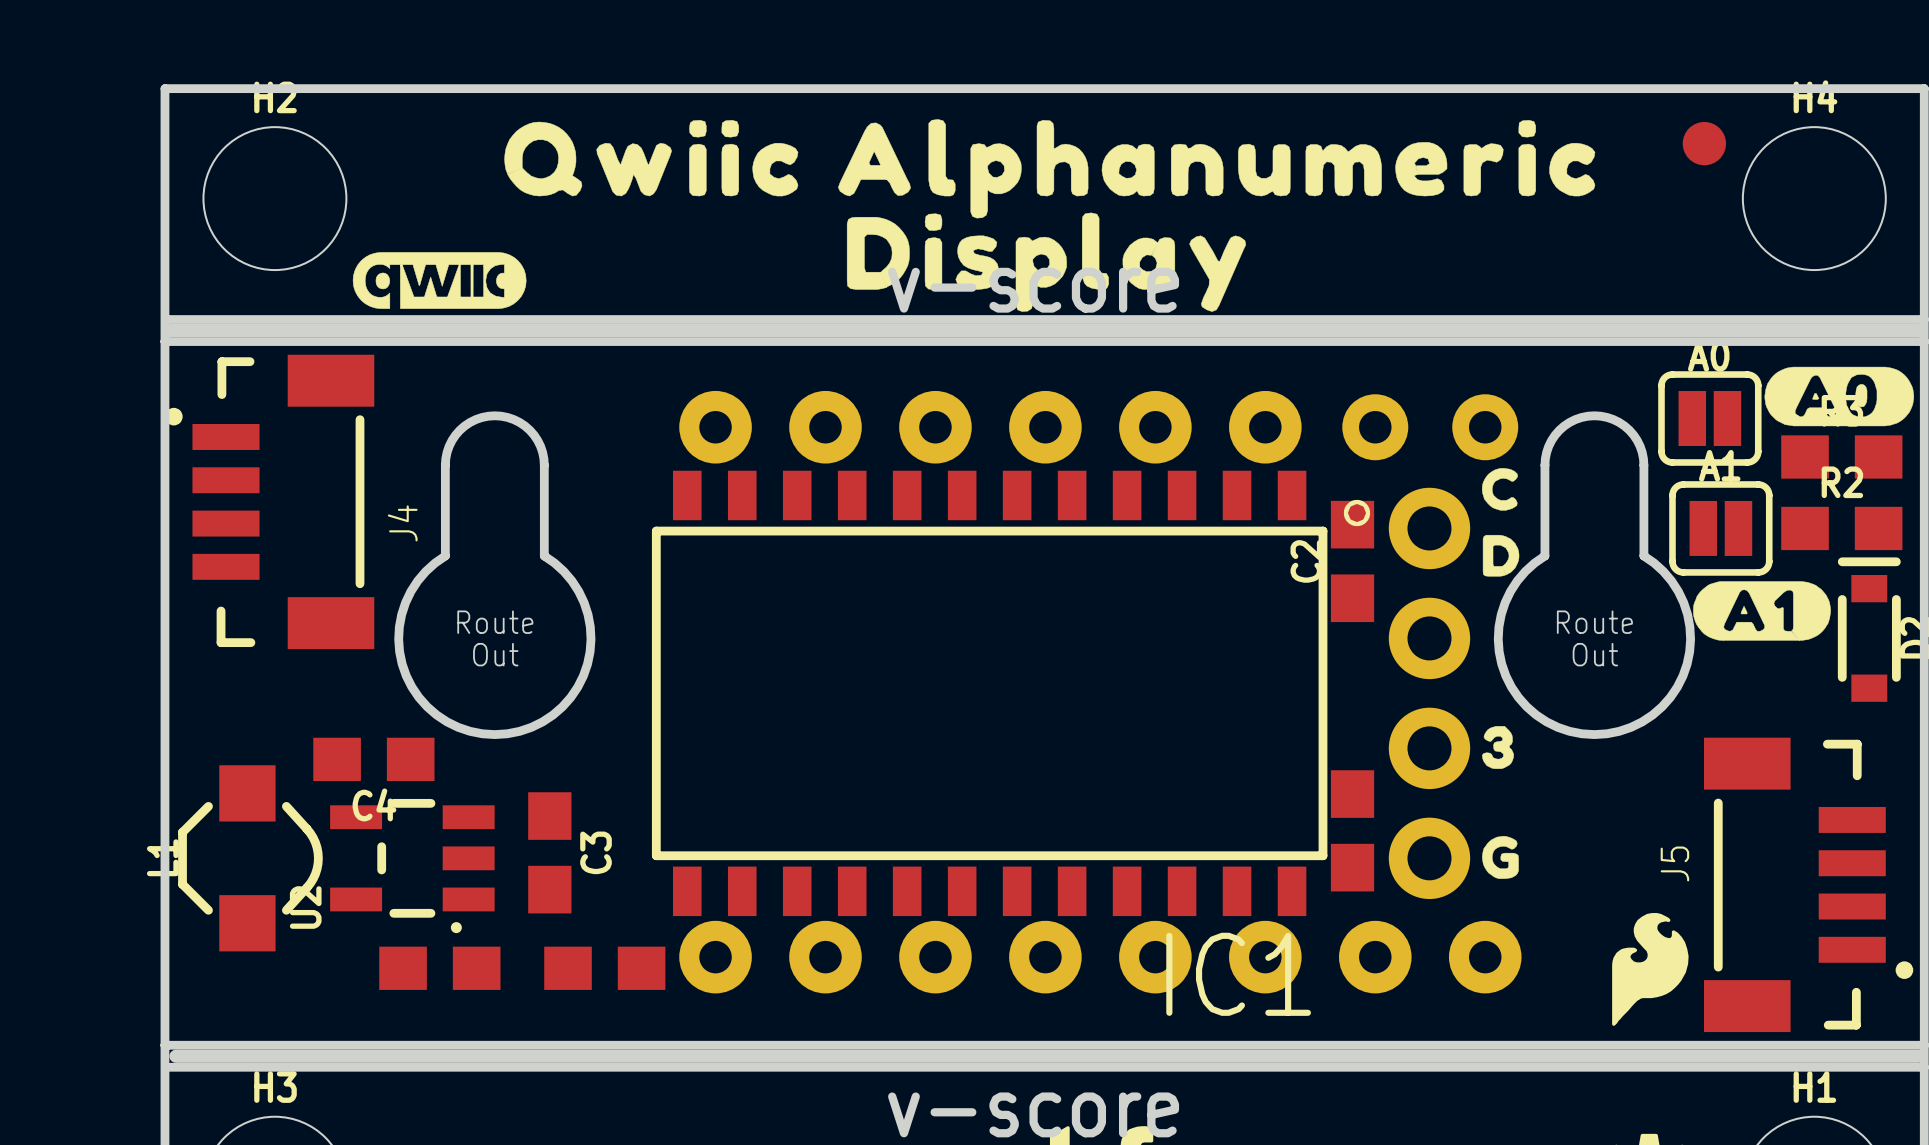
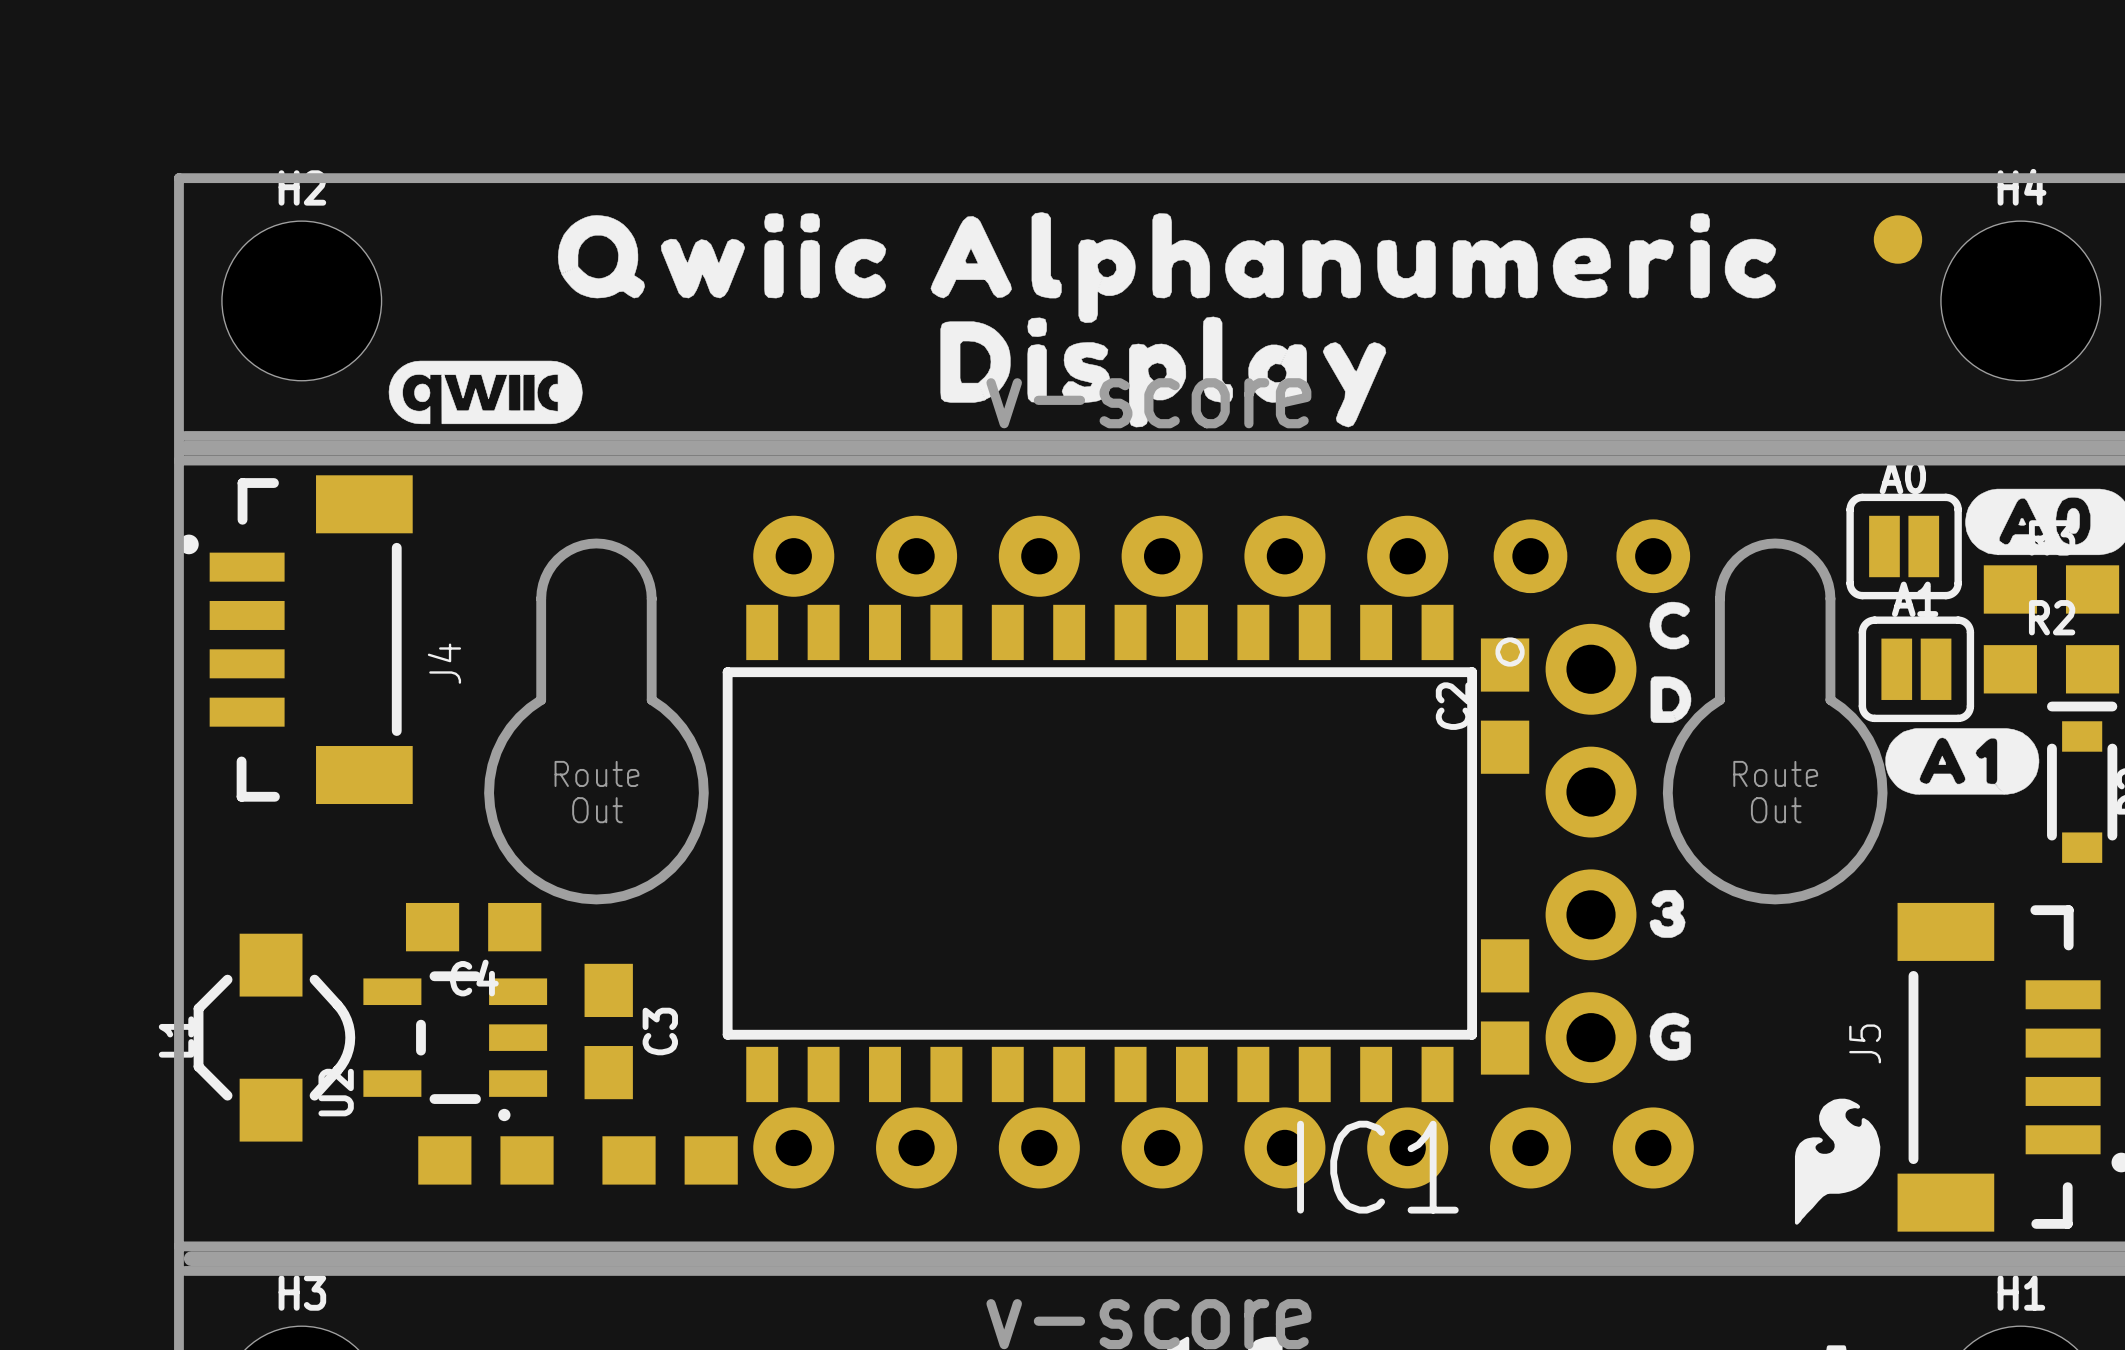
drawing position: (494, 575) -> (596, 721)
C4 position: (373, 759) -> (473, 927)

